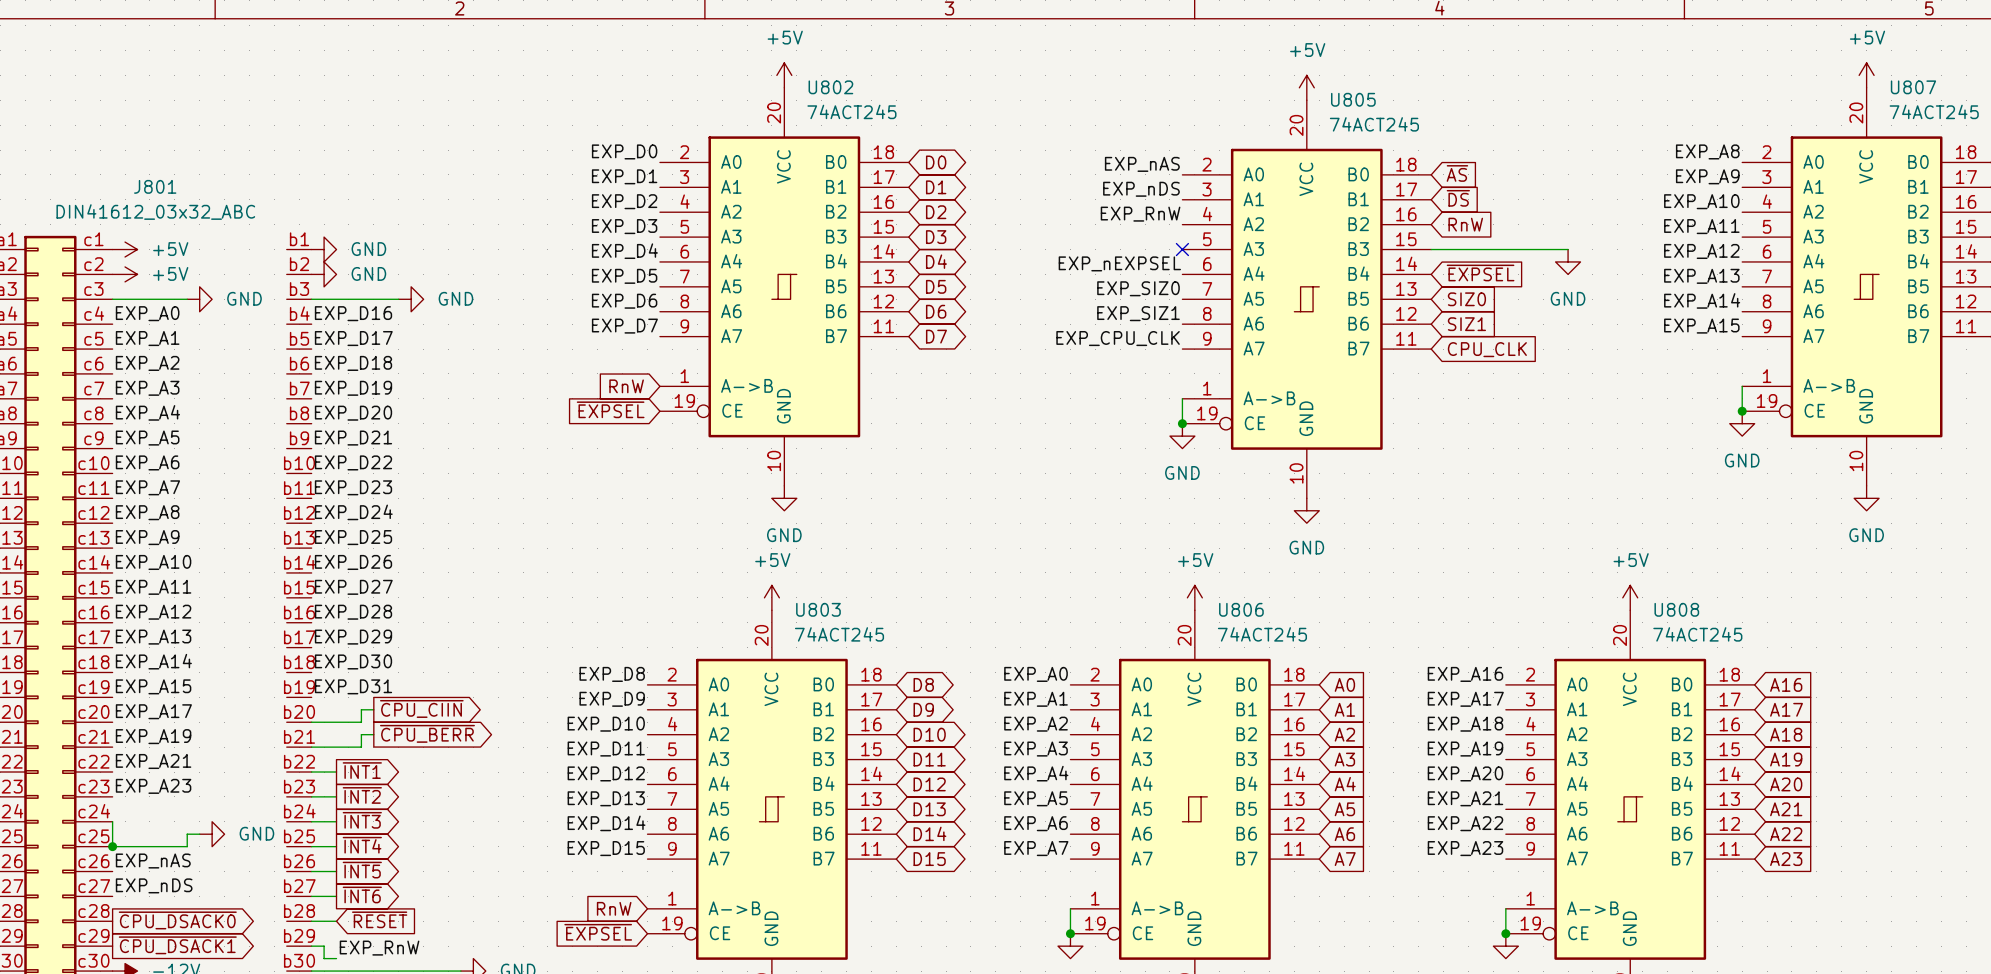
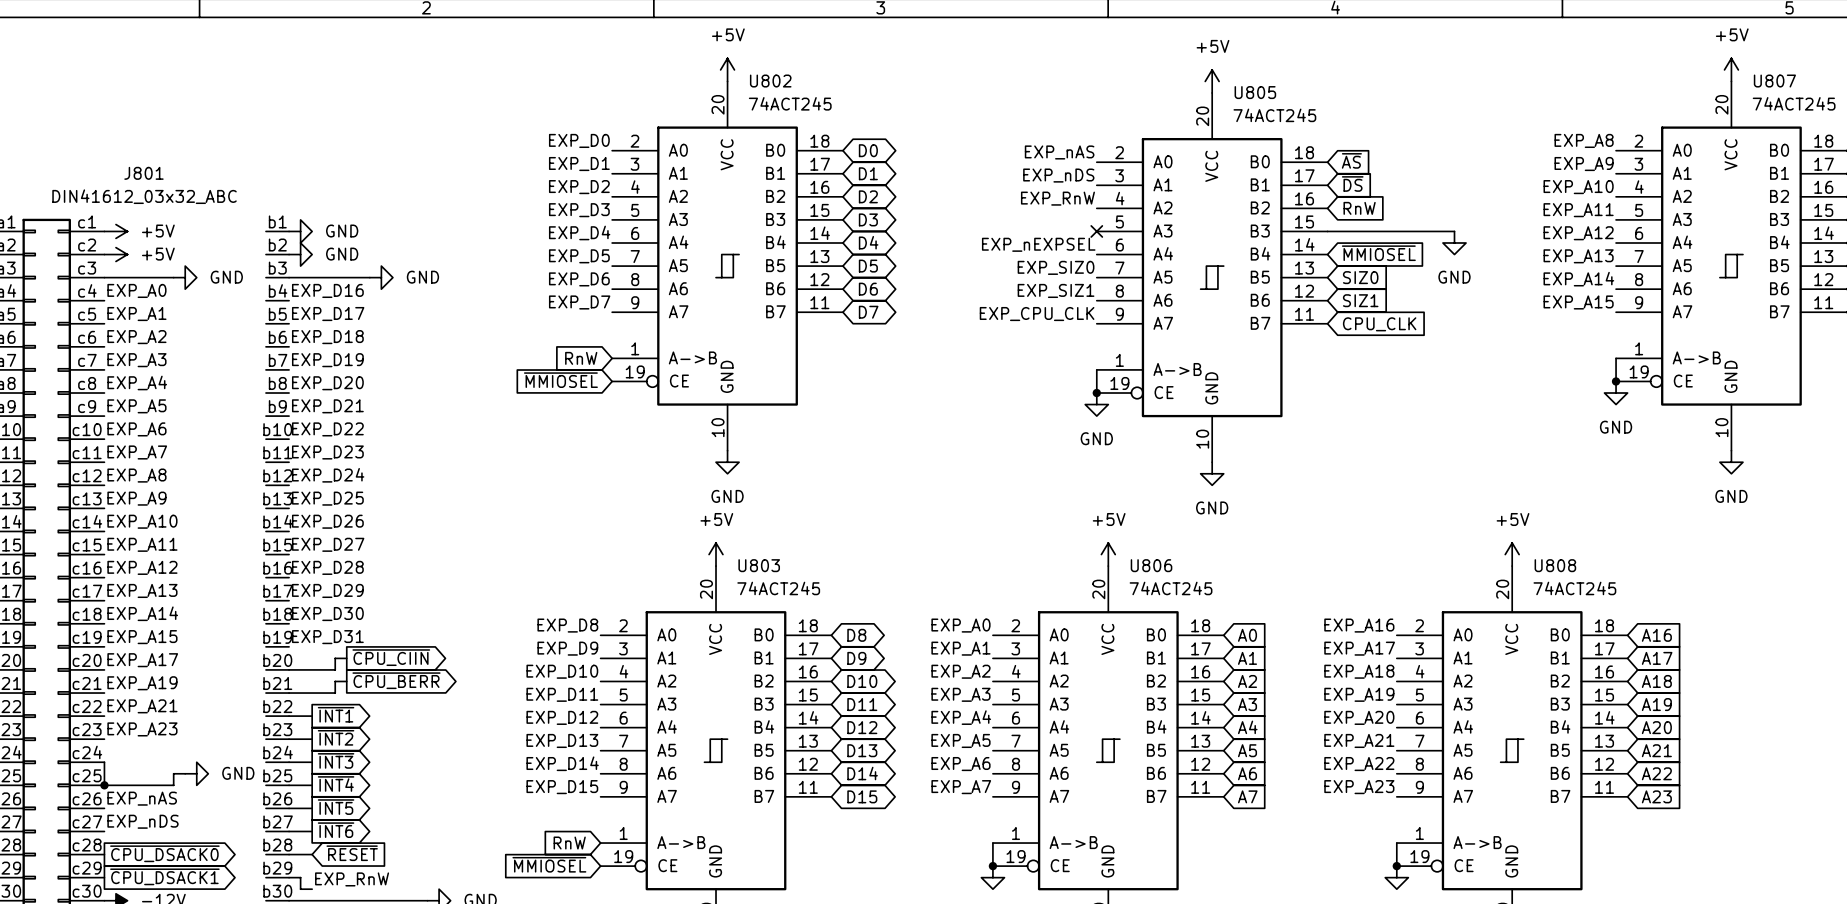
global label: ~{EXPSEL} (1480, 272) -> ~{MMIOSEL} (1378, 253)
global label: ~{EXPSEL} (610, 409) -> ~{MMIOSEL} (560, 380)
global label: ~{EXPSEL} (598, 932) -> ~{MMIOSEL} (549, 864)

